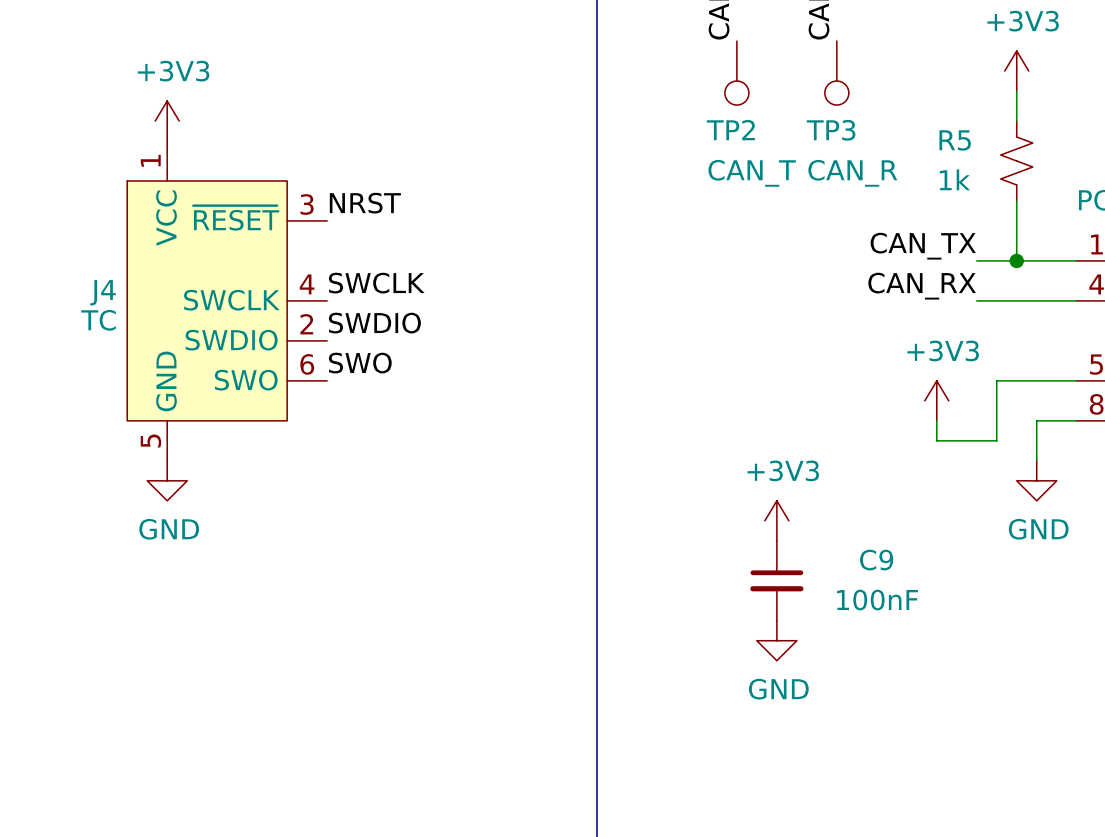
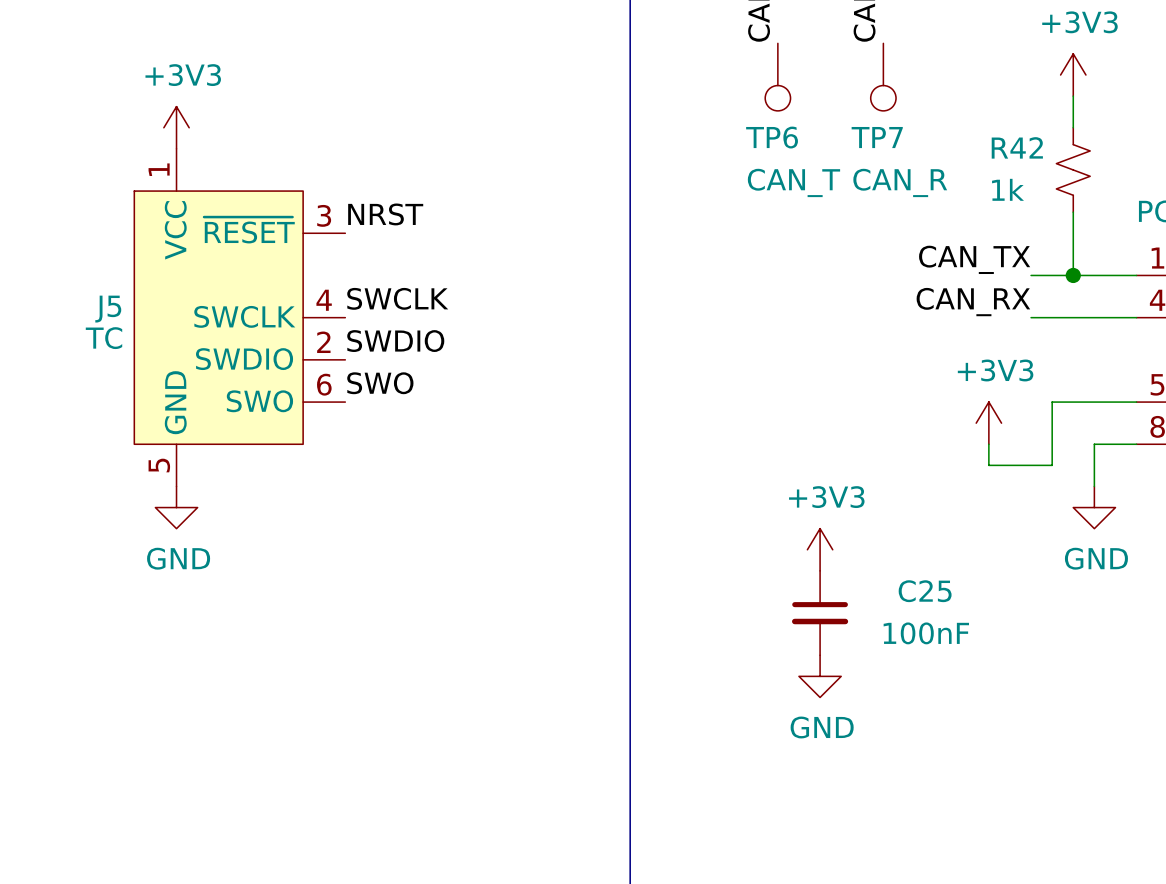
TP2 name: TP2 (730, 130) -> TP6 (772, 137)
TP3 name: TP3 (831, 130) -> TP7 (877, 137)
R5 name: R5 (955, 140) -> R42 (1017, 147)
J4 name: J4 (103, 292) -> J5 (108, 309)
C9 name: C9 (876, 560) -> C25 (925, 591)

